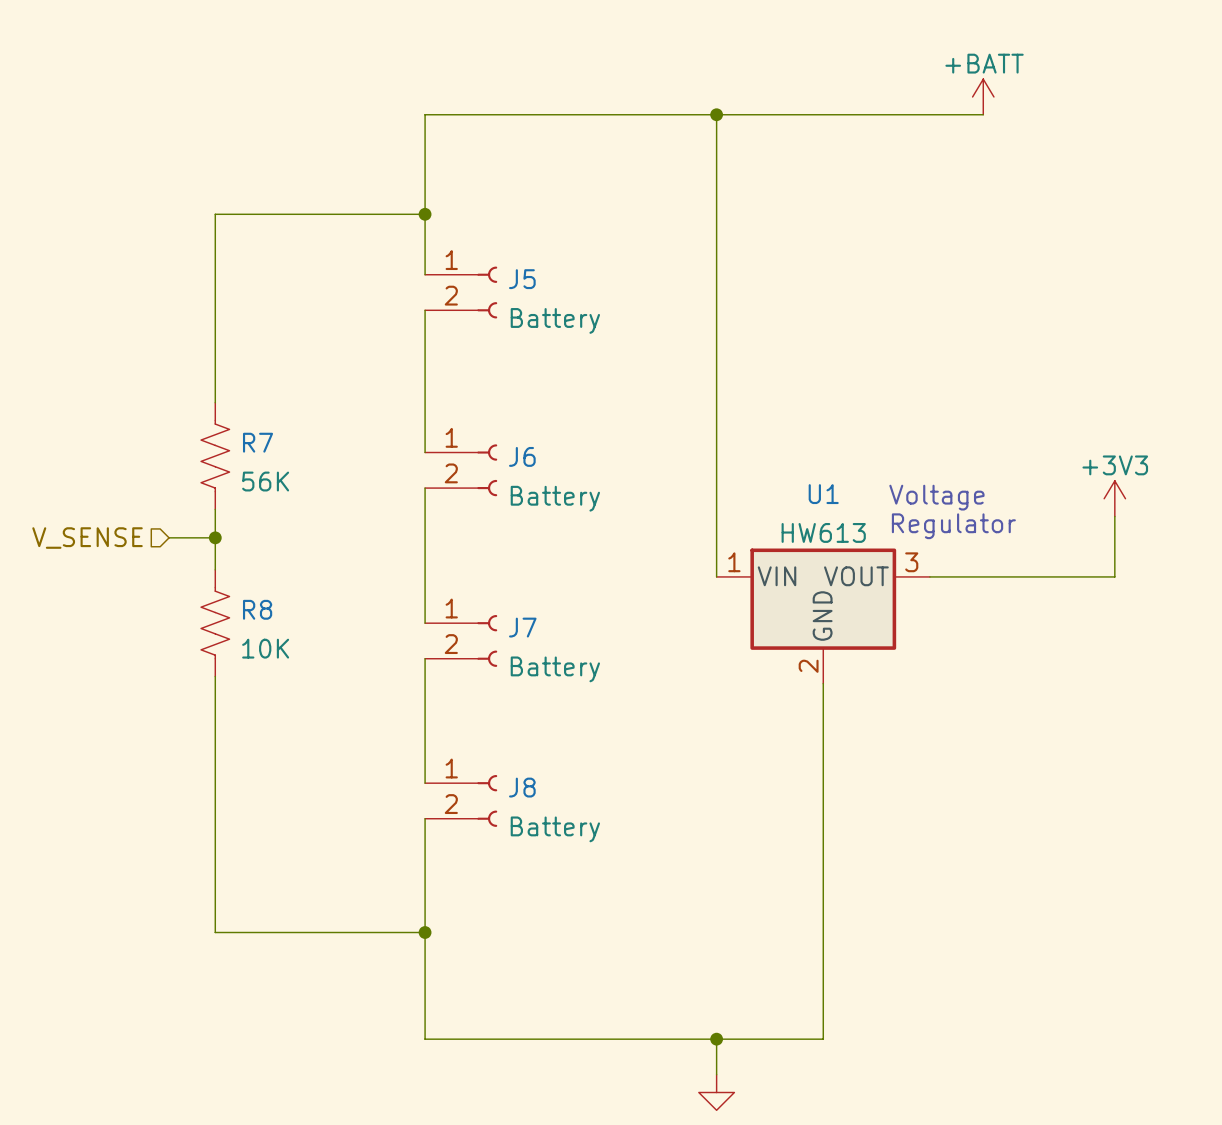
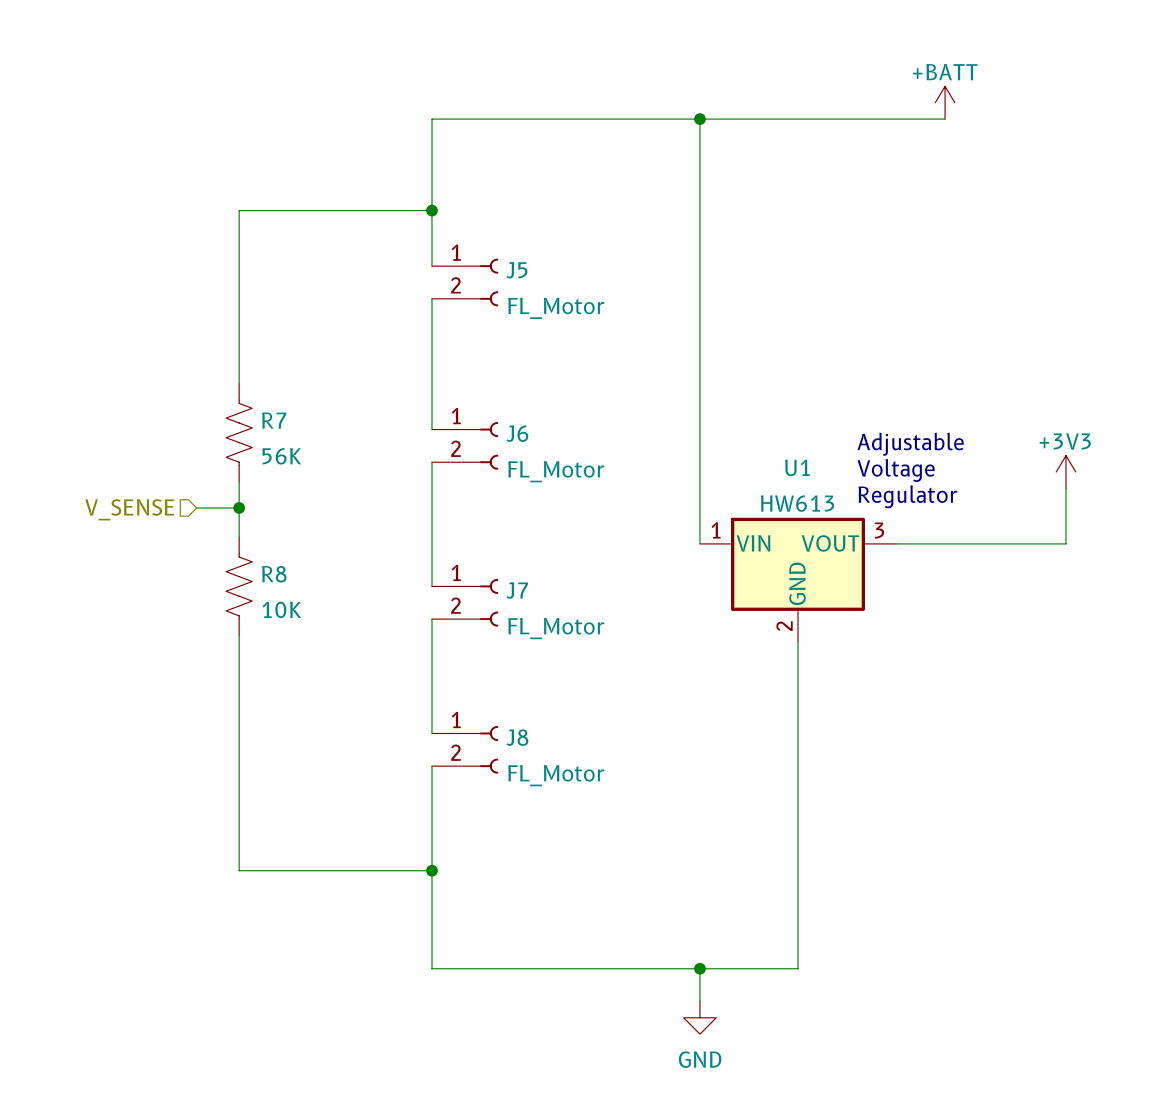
J5 value: Battery (555, 320) -> FL_Motor (556, 308)
text: none -> Adjustable (910, 444)
J6 value: Battery (555, 498) -> FL_Motor (556, 471)
J7 value: Battery (555, 669) -> FL_Motor (556, 628)
J8 value: Battery (555, 829) -> FL_Motor (556, 775)

